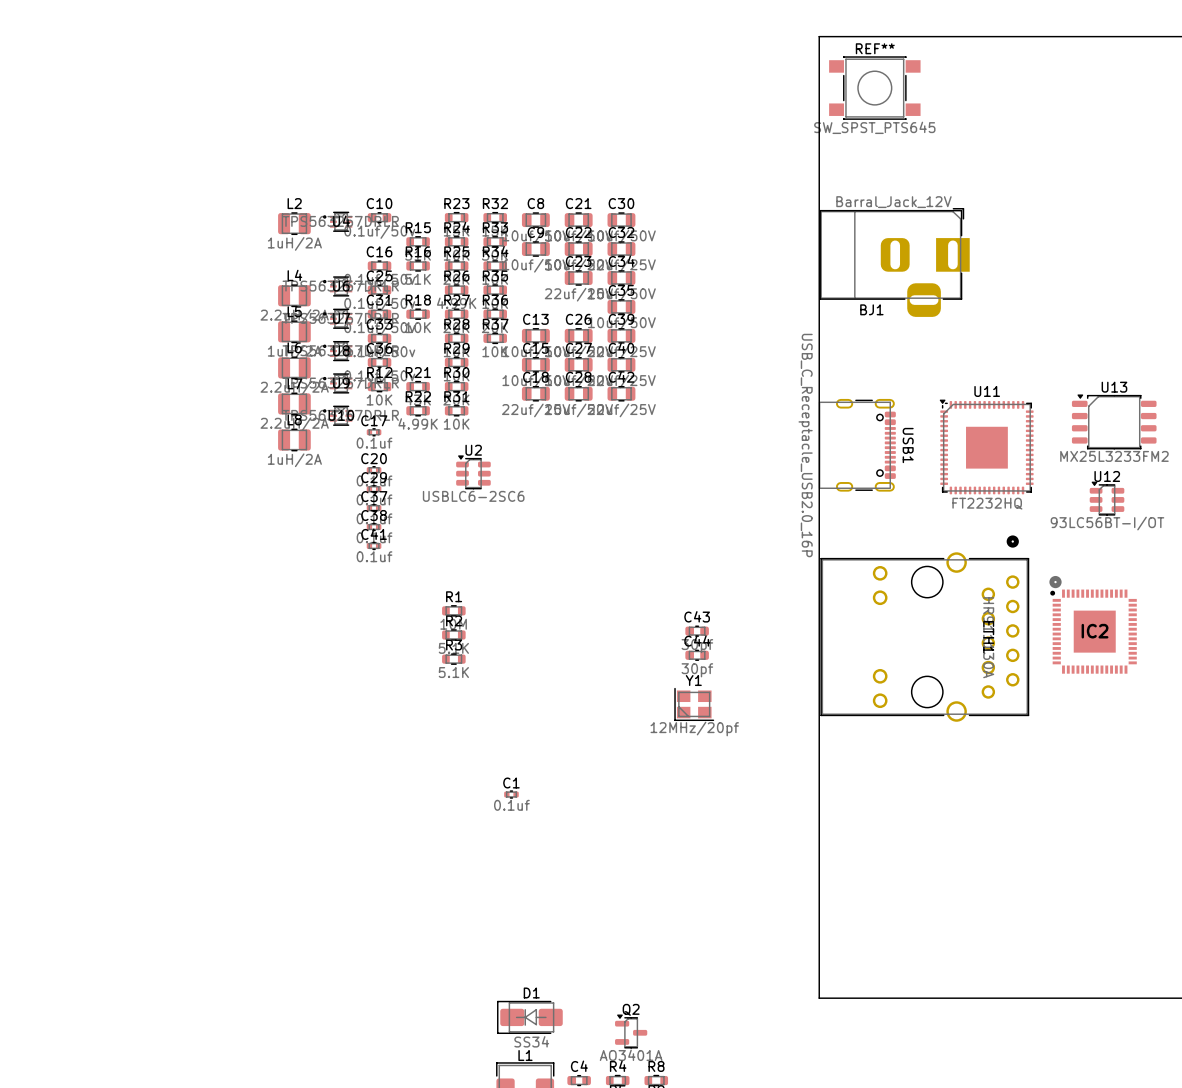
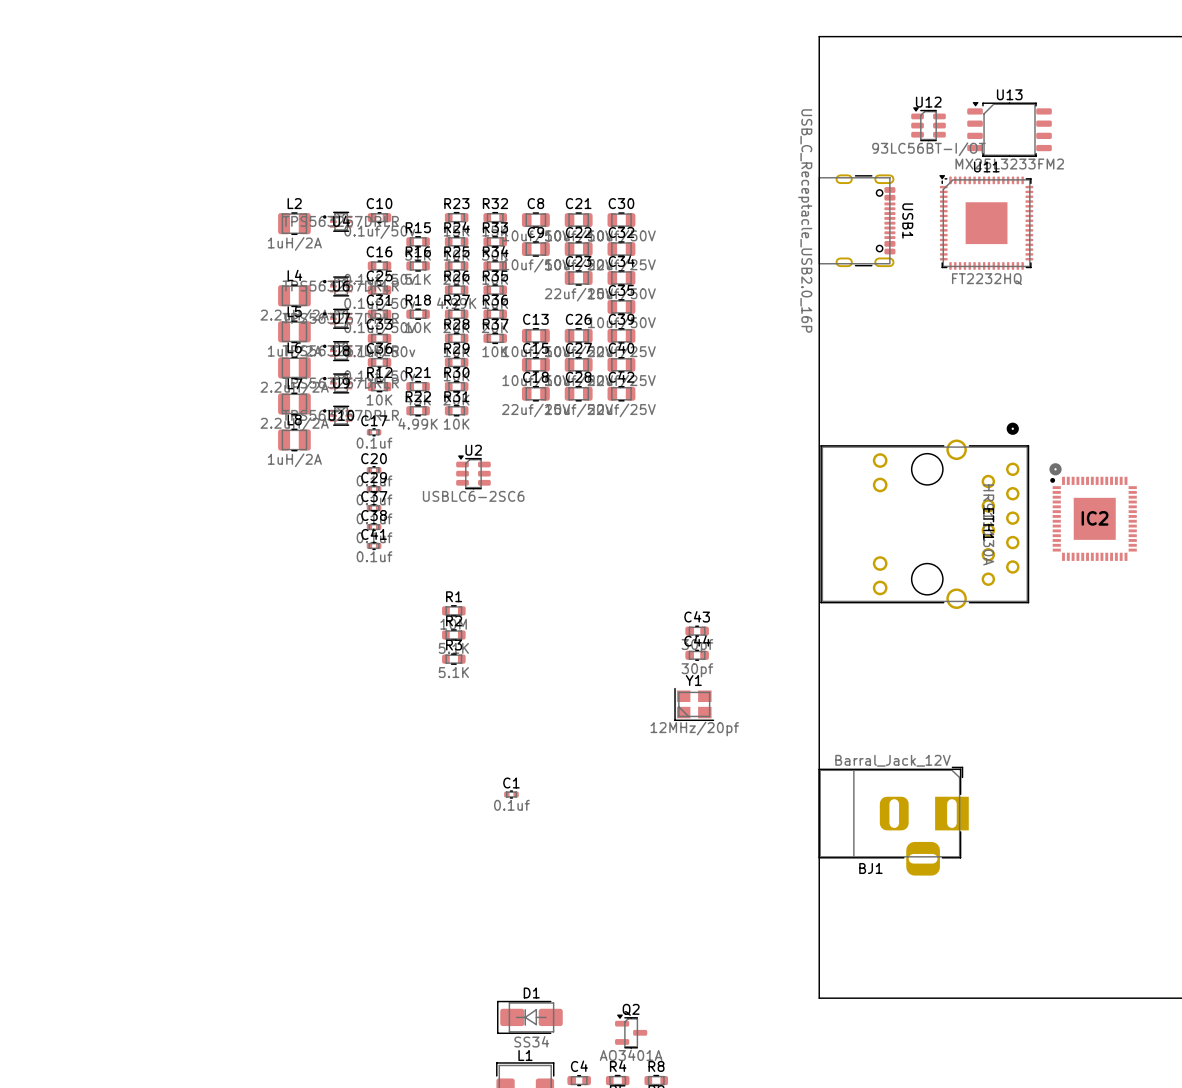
REF**: SW_SPST_PTS645 (874, 88) -> none
BJ1 position: (894, 262) -> (893, 821)
U13 position: (1114, 421) -> (1009, 129)
USB1 position: (857, 445) -> (857, 220)
U11 position: (986, 446) -> (986, 222)
U12 position: (1107, 498) -> (928, 124)
ETH1 position: (941, 628) -> (941, 515)
IC2 position: (1093, 631) -> (1093, 518)

